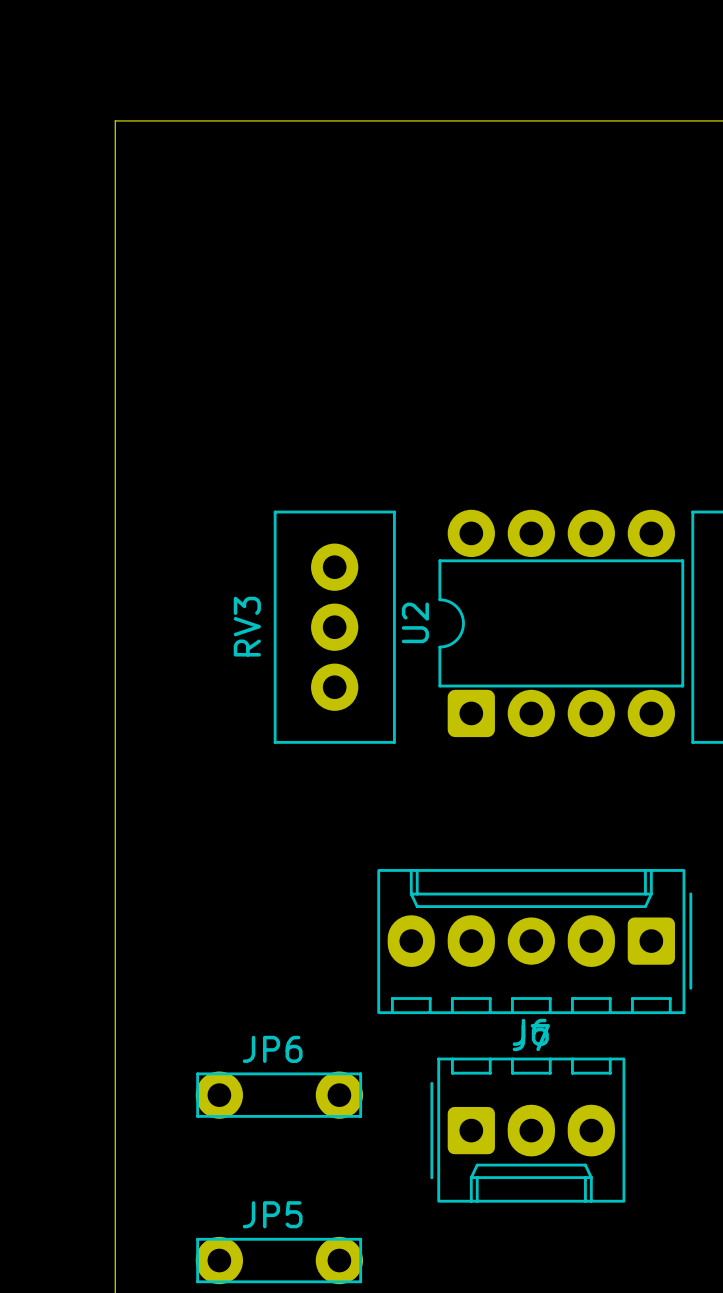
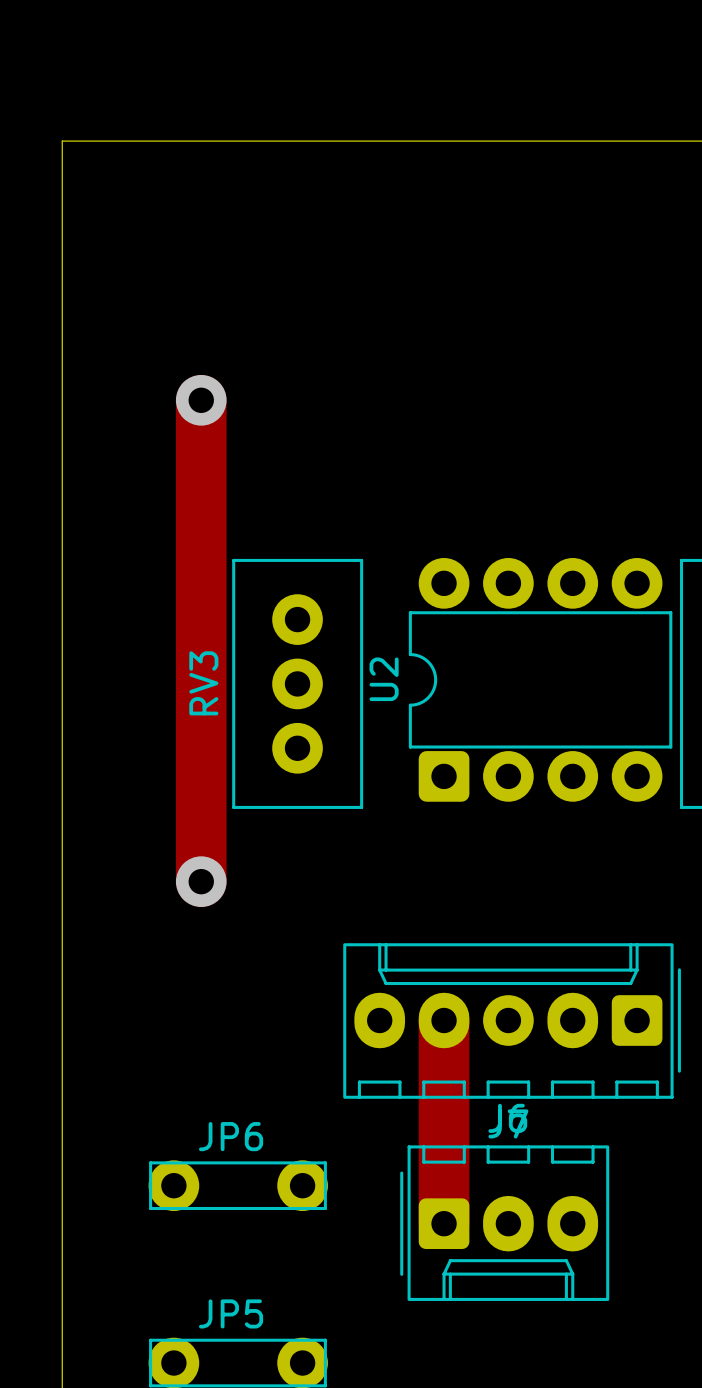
track: none -> (201, 400) (201, 881)
via: none -> (201, 400)
via: none -> (201, 881)
track: none -> (444, 1020) (444, 1223)

